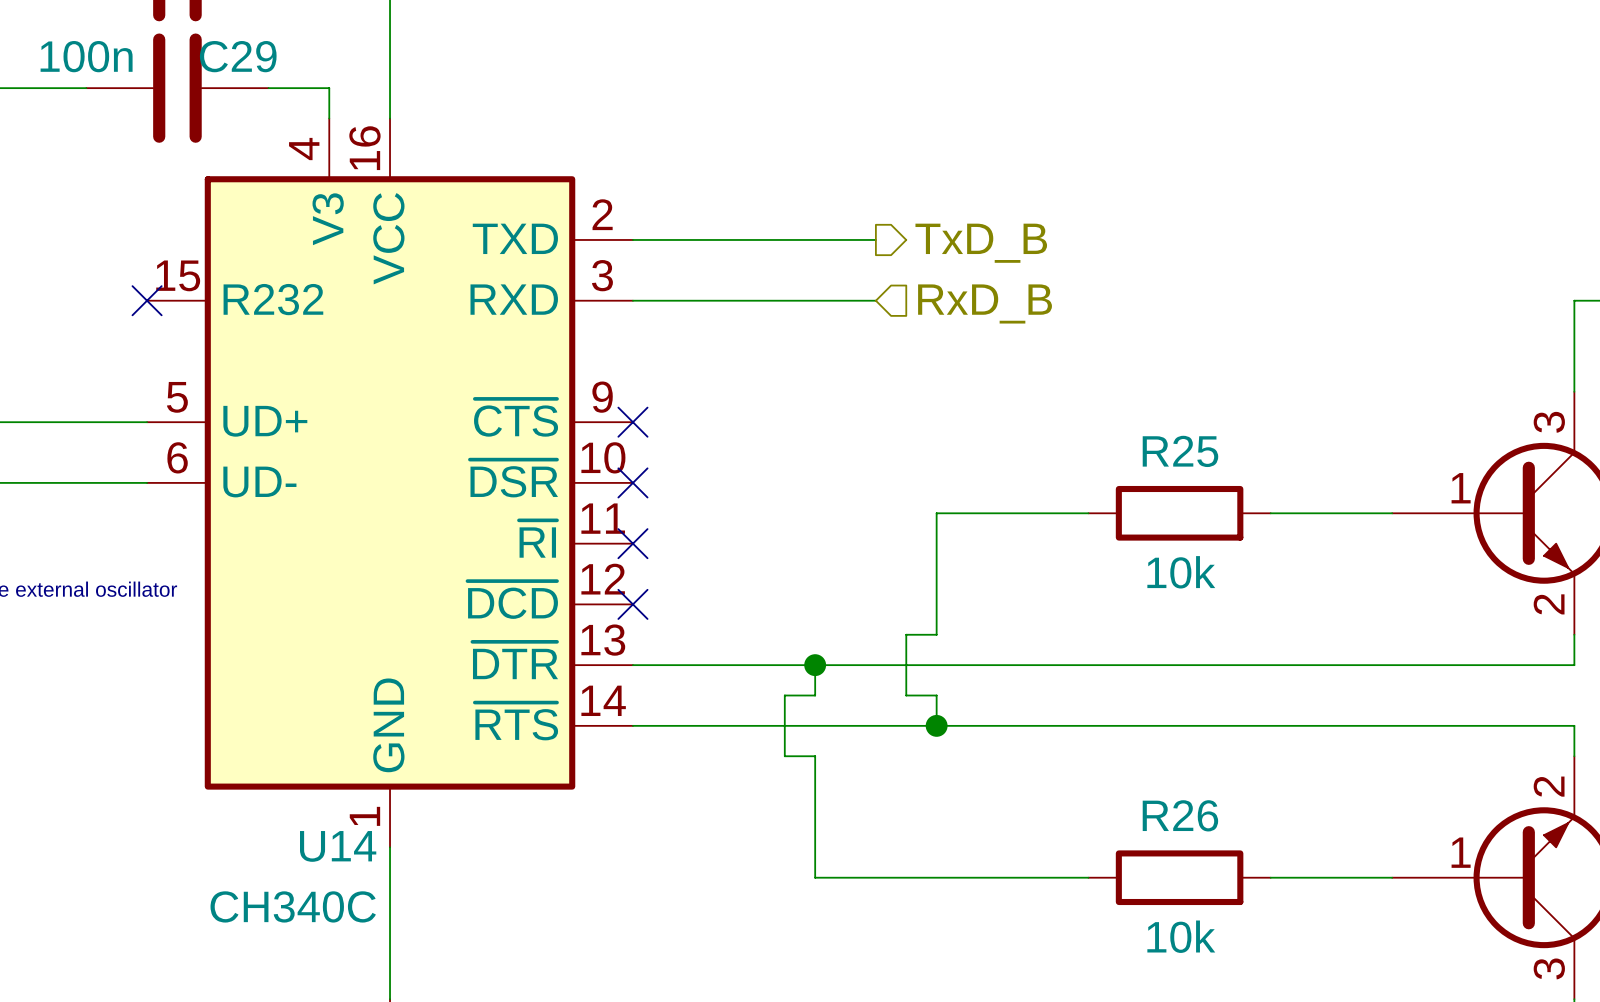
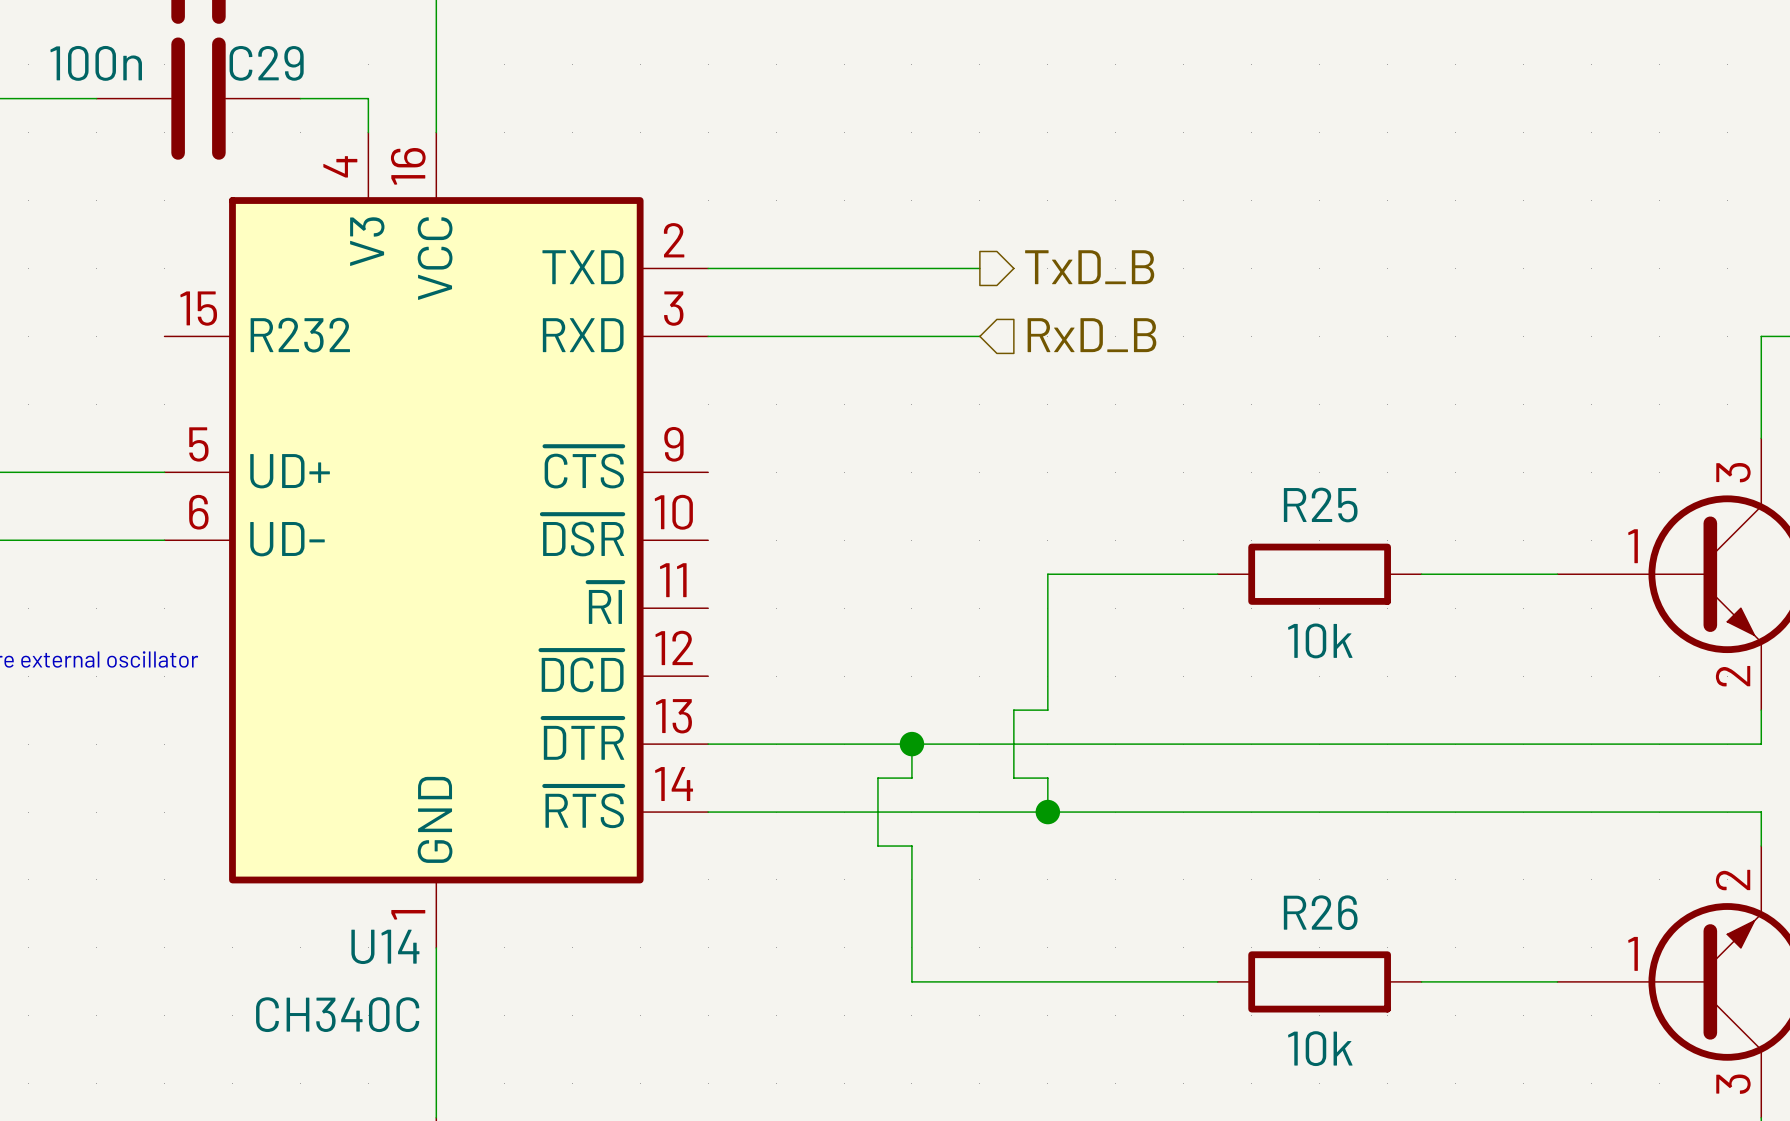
no-connect mark: (147, 300) -> none
no-connect mark: (632, 422) -> none
no-connect mark: (632, 482) -> none
no-connect mark: (632, 543) -> none
no-connect mark: (632, 604) -> none

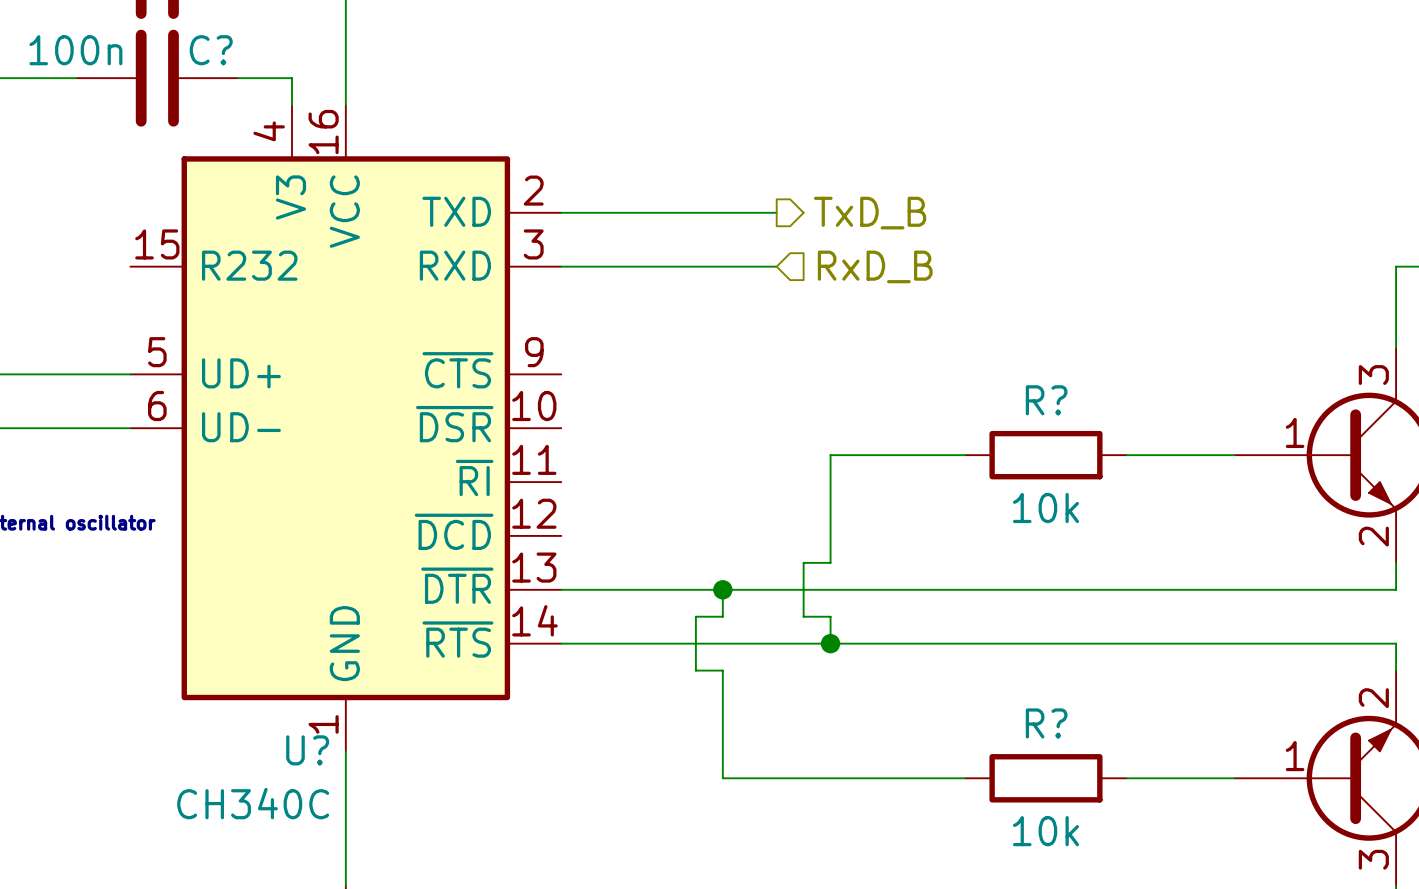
C29 name: C29 (266, 63) -> C? (211, 50)
R25 name: R25 (1320, 504) -> R? (1046, 400)
R26 name: R26 (1320, 912) -> R? (1046, 723)
U14 name: U14 (385, 946) -> U? (307, 750)

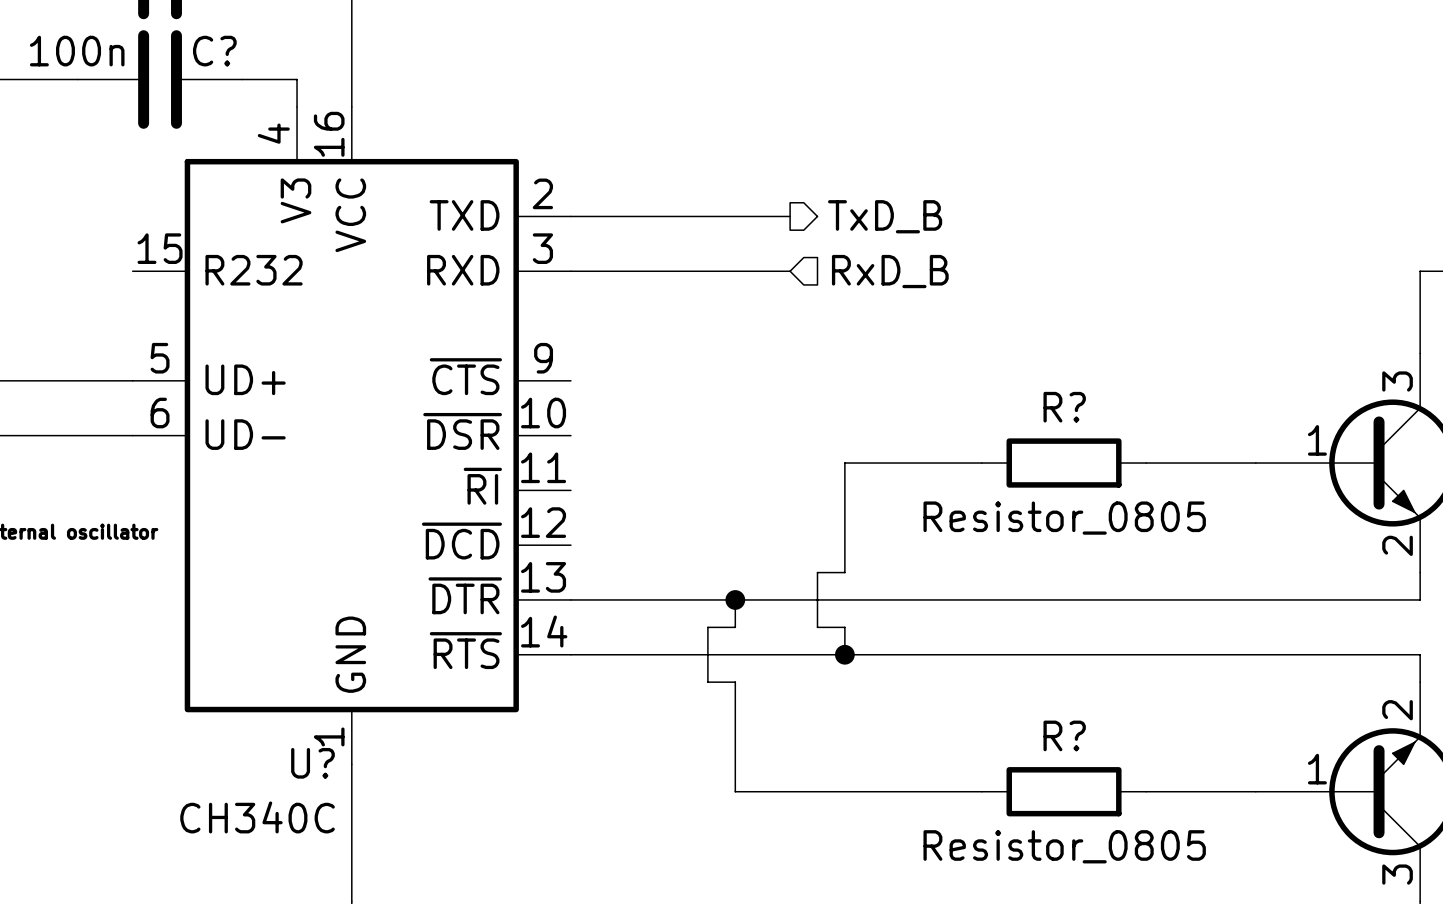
R? value: 10k (1045, 508) -> Resistor_0805 (1064, 518)
R? value: 10k (1045, 831) -> Resistor_0805 (1064, 846)

